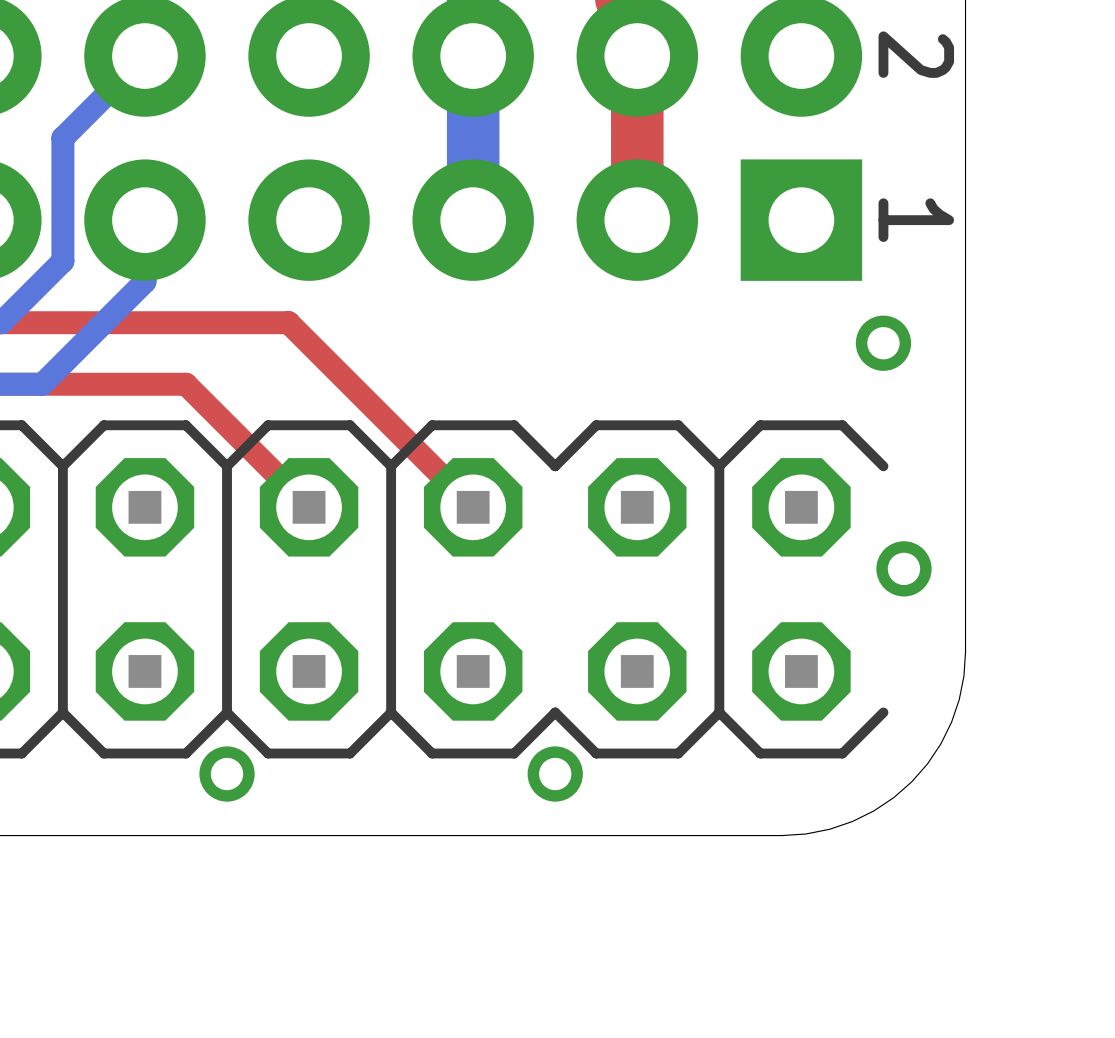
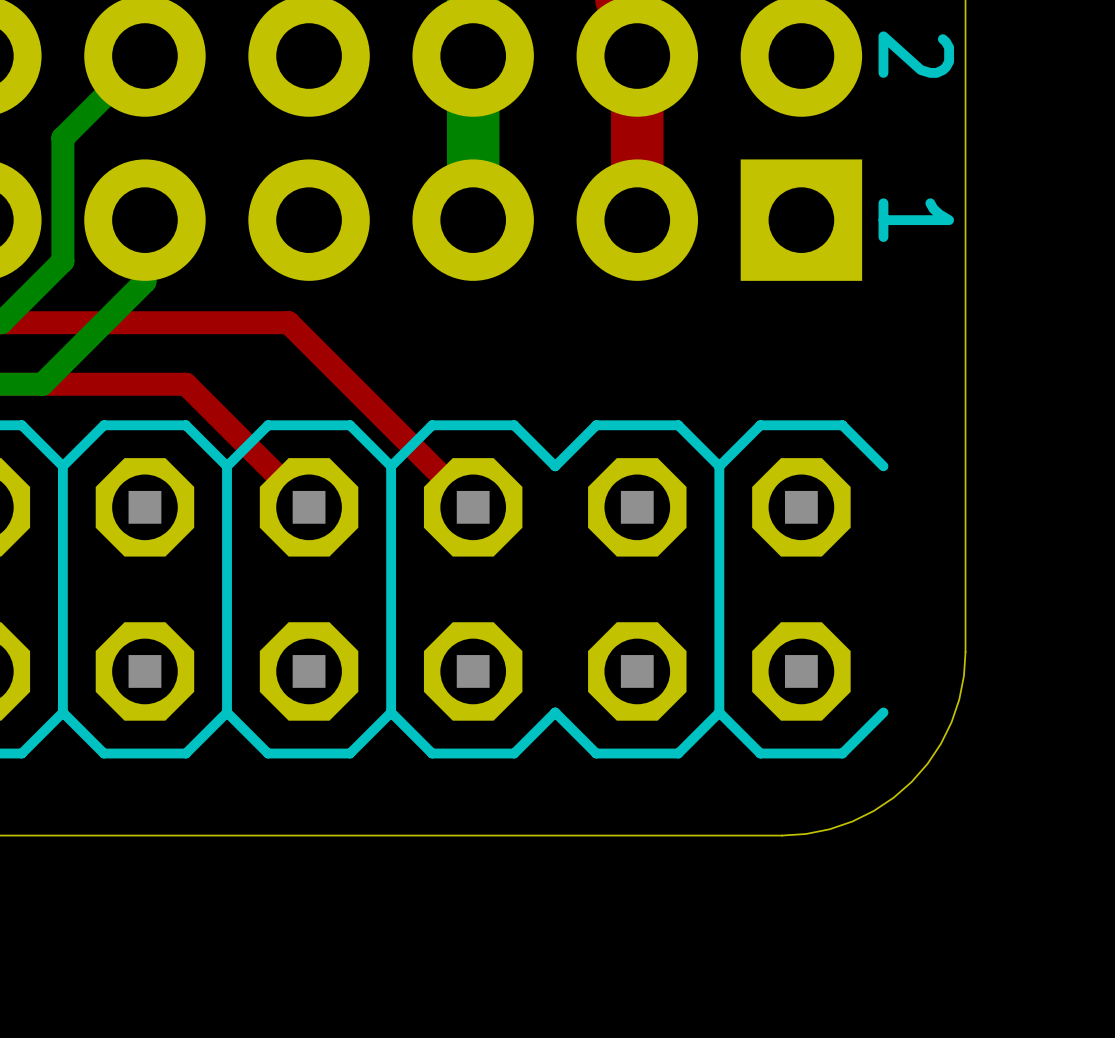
via: (883, 343) -> none
via: (903, 568) -> none
via: (227, 774) -> none
via: (555, 774) -> none

